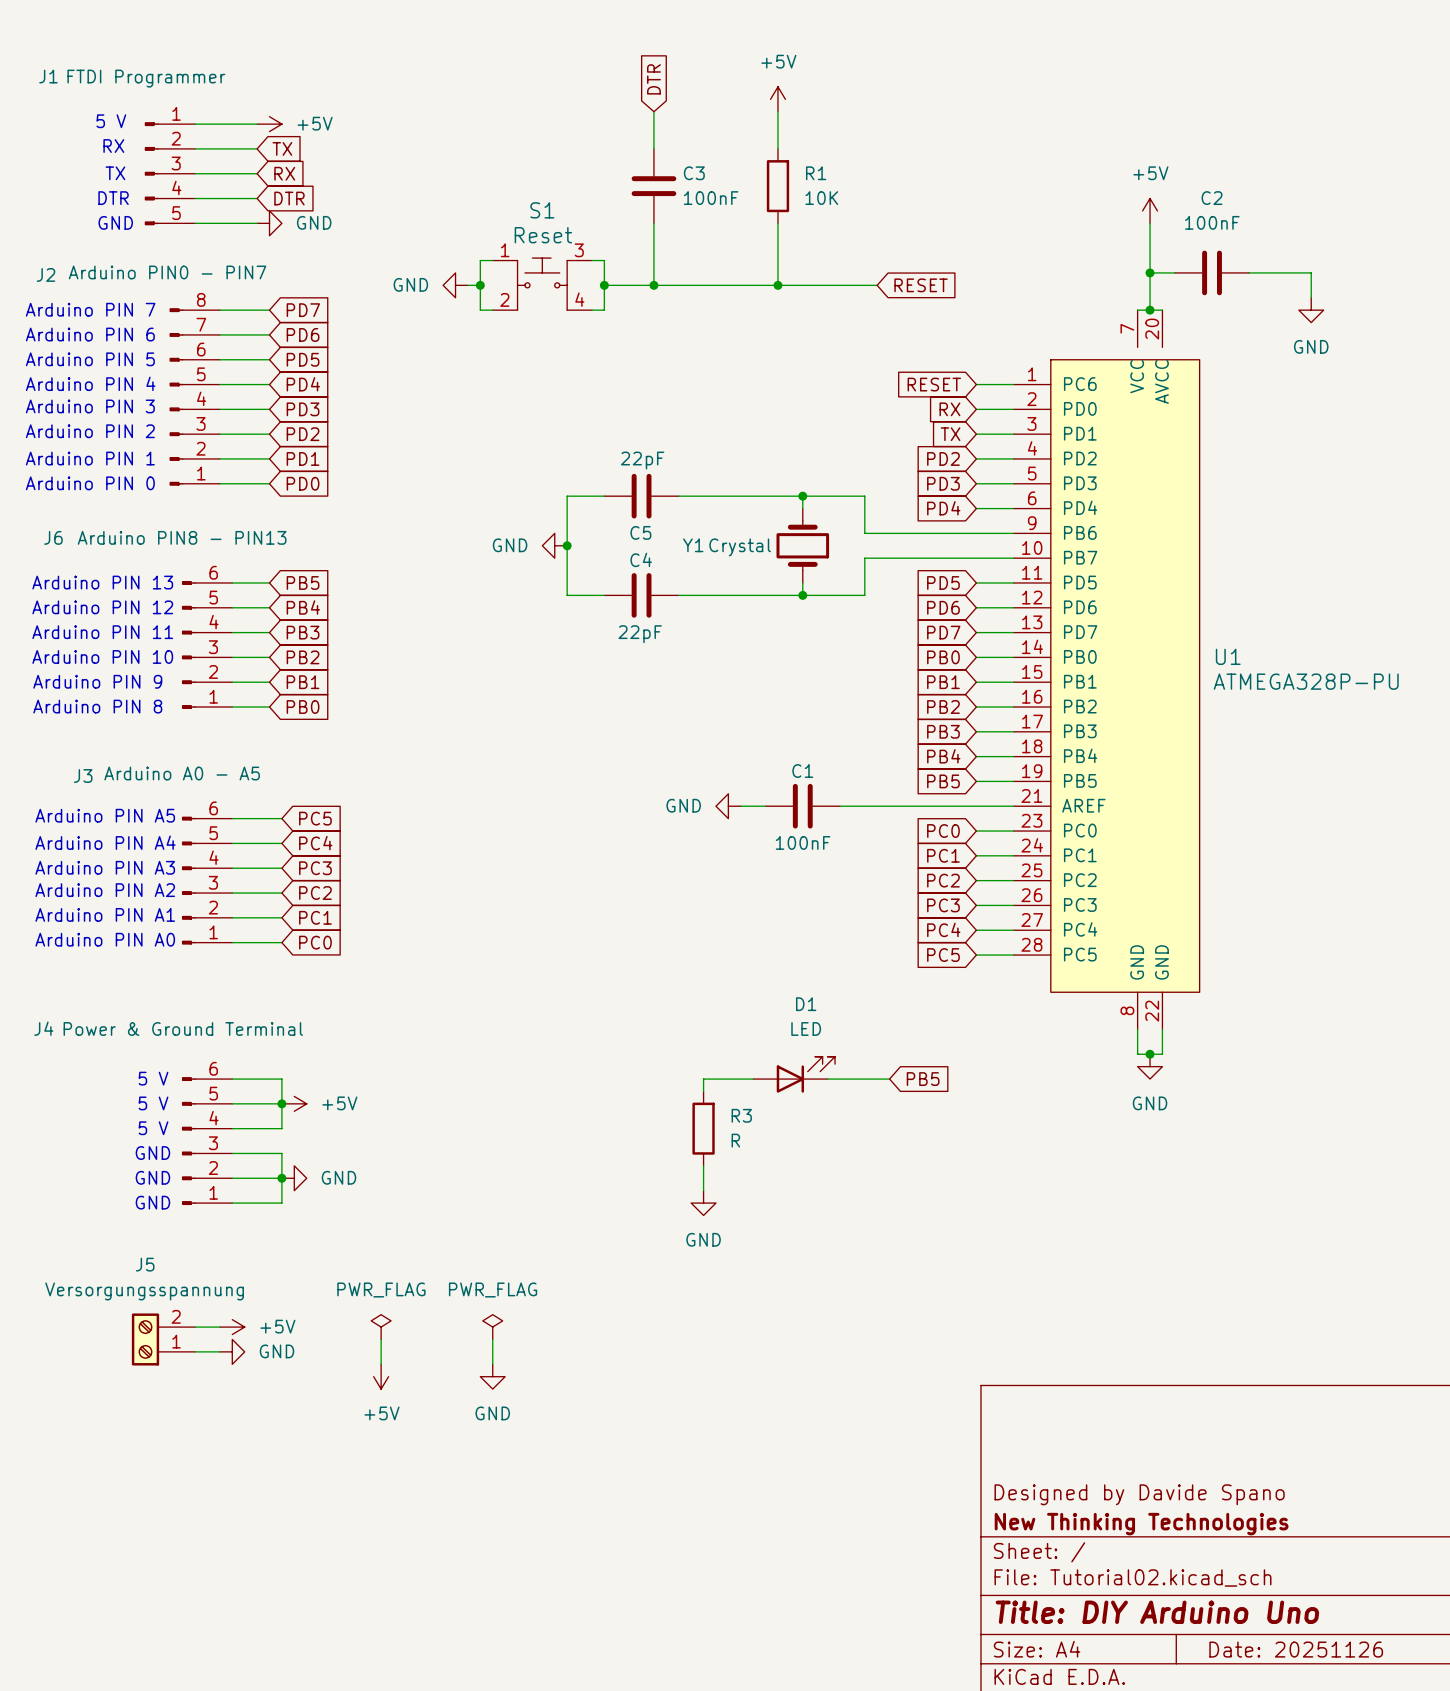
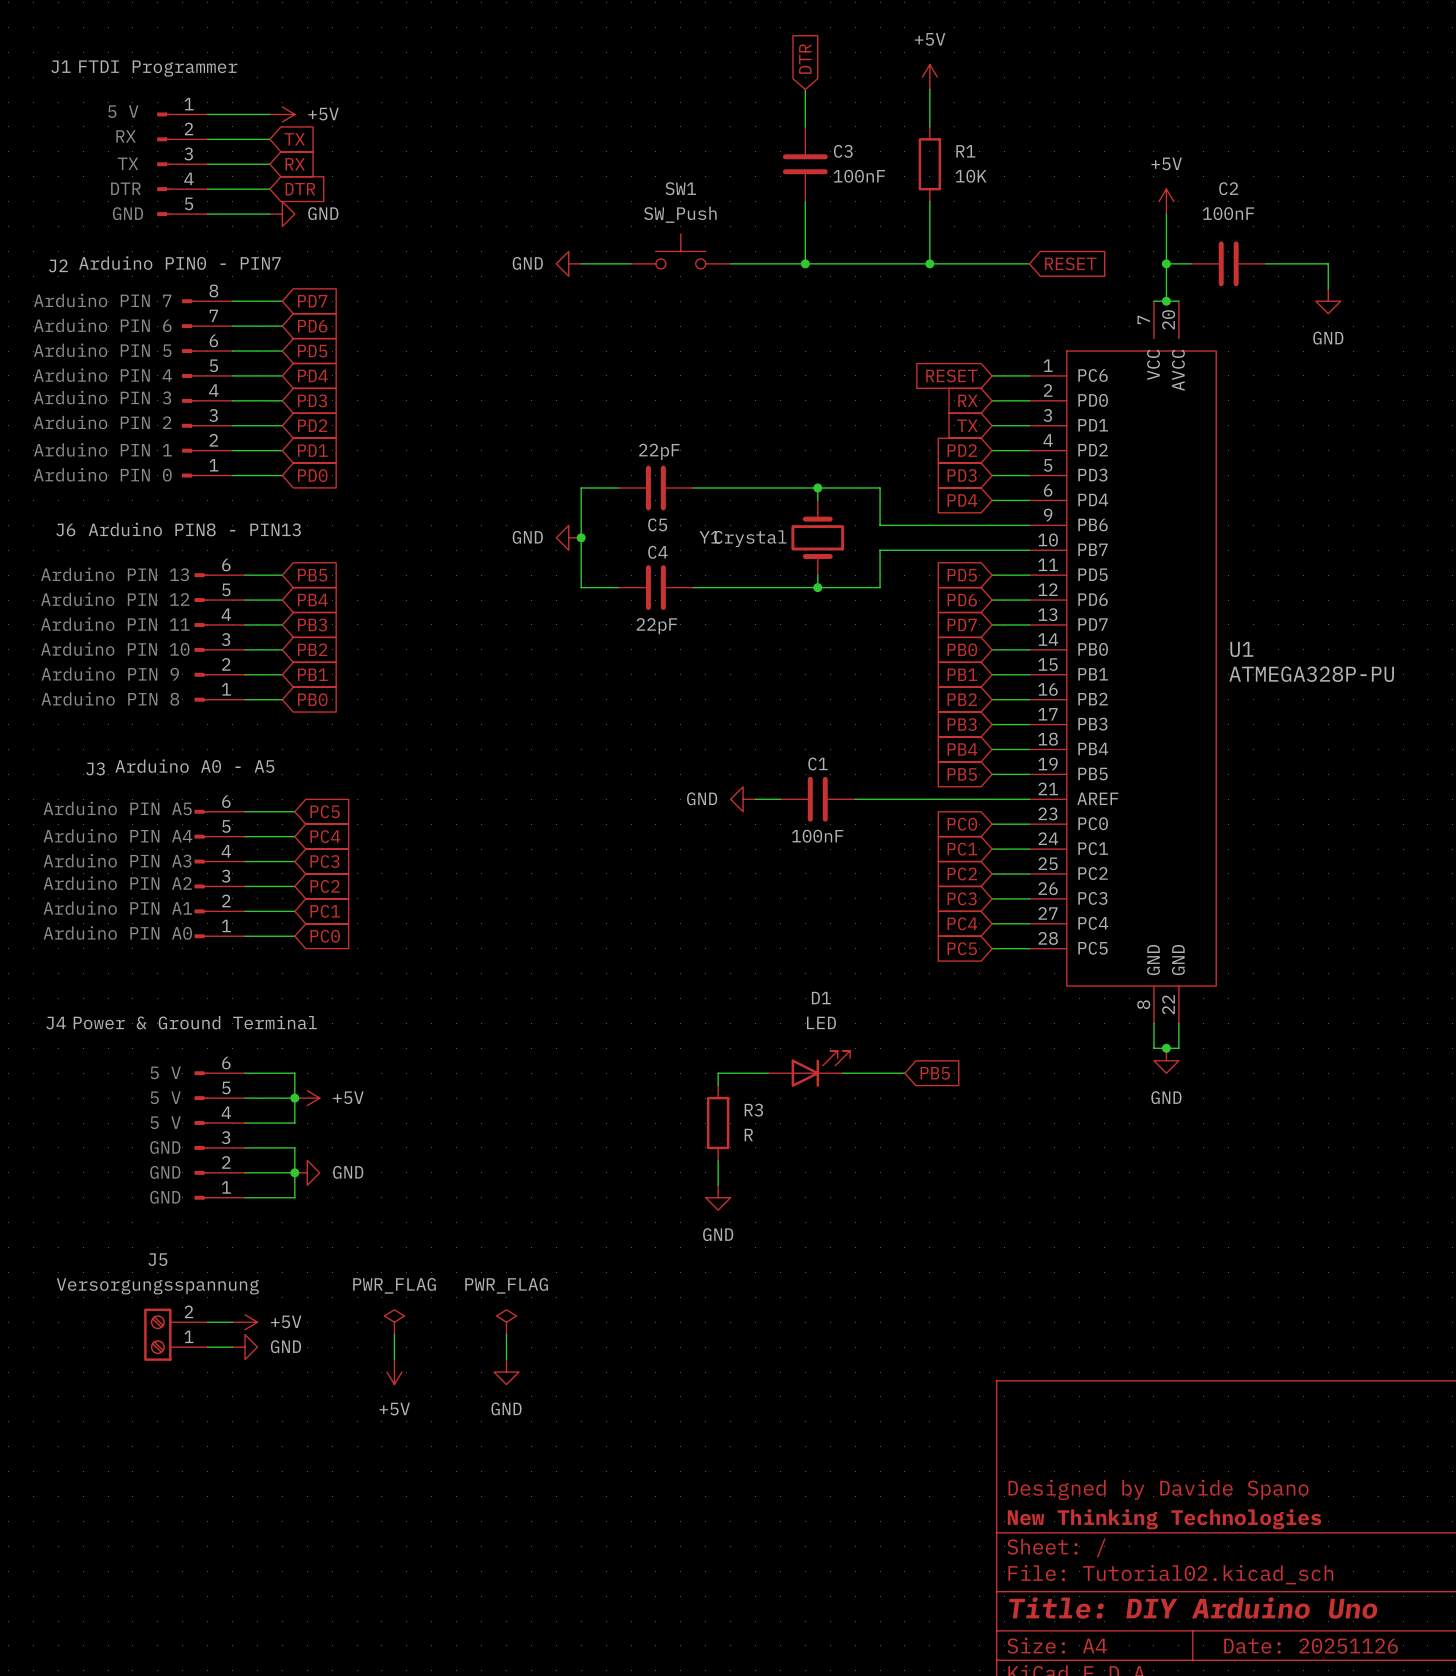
global label position: DTR (653, 79) -> DTR (805, 59)
power symbol position: +5V (777, 99) -> +5V (929, 77)
wire: (653, 111) (653, 148) -> (805, 89) (805, 126)
wire: (777, 111) (777, 148) -> (929, 89) (929, 126)
C3 position: (653, 186) -> (805, 164)
R1 position: (777, 186) -> (929, 164)
wire: (653, 223) (653, 285) -> (805, 201) (805, 263)
wire: (777, 223) (777, 285) -> (929, 201) (929, 263)
wire: (492, 260) (480, 260) (480, 310) (492, 310) -> none
wire: (591, 260) (604, 260) (604, 310) (591, 310) -> none
SW1: none -> SW_Push (680, 251)
wire: none -> (581, 263) (631, 263)
wire: none -> (730, 263) (1029, 263)
junction: none -> (929, 263)
S1: Reset (542, 284) -> none
power symbol position: GND (455, 285) -> GND (568, 263)
wire: (467, 285) (480, 285) -> none
junction: (480, 285) -> none
wire: (604, 285) (877, 285) -> none
junction: (604, 285) -> none
junction: (653, 285) -> none
junction position: (777, 285) -> (805, 263)
global label position: RESET (921, 285) -> RESET (1070, 263)

